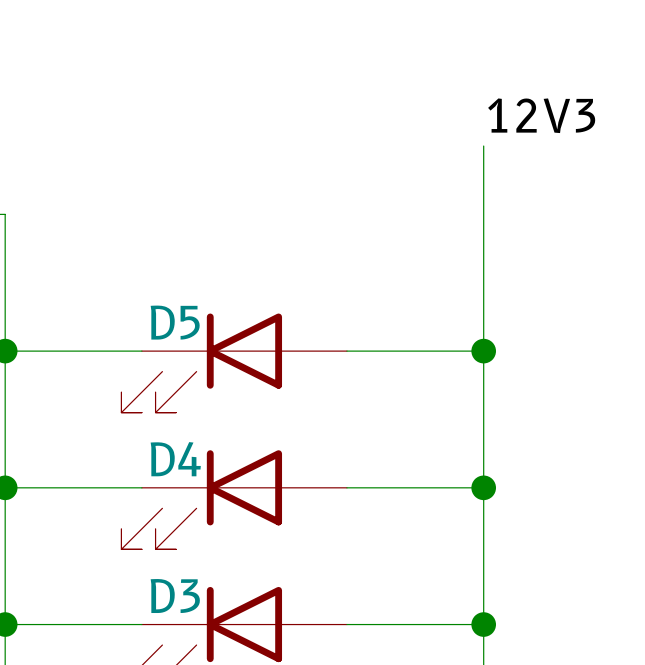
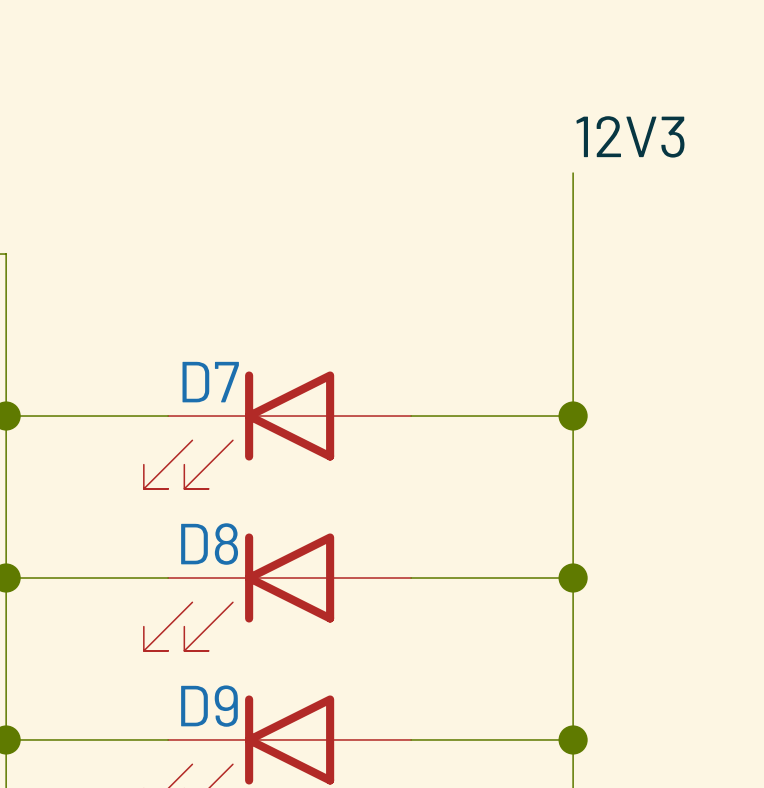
D5 name: D5 (175, 322) -> D7 (210, 382)
D4 name: D4 (175, 459) -> D8 (209, 544)
D3 name: D3 (175, 596) -> D9 (209, 706)

